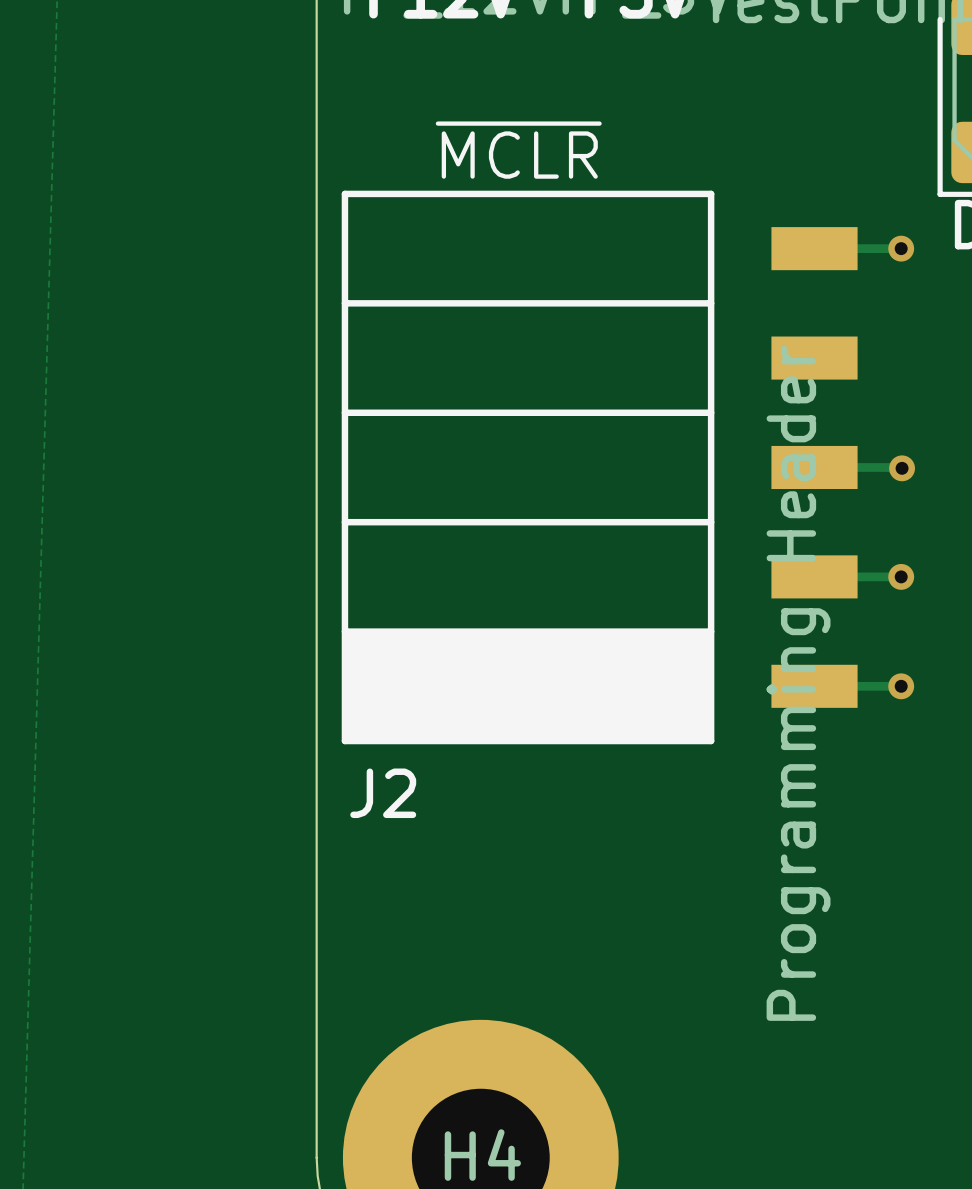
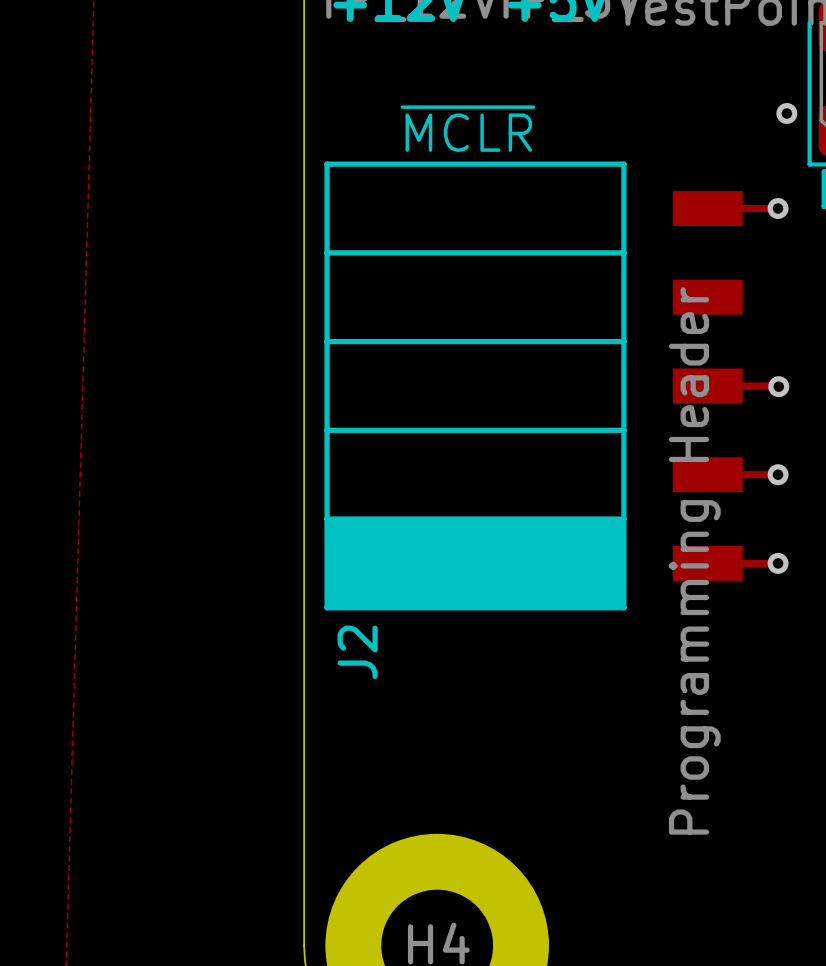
via: none -> (786, 113)
J2 name rotation: 0° (383, 793) -> 90° counterclockwise (357, 652)

